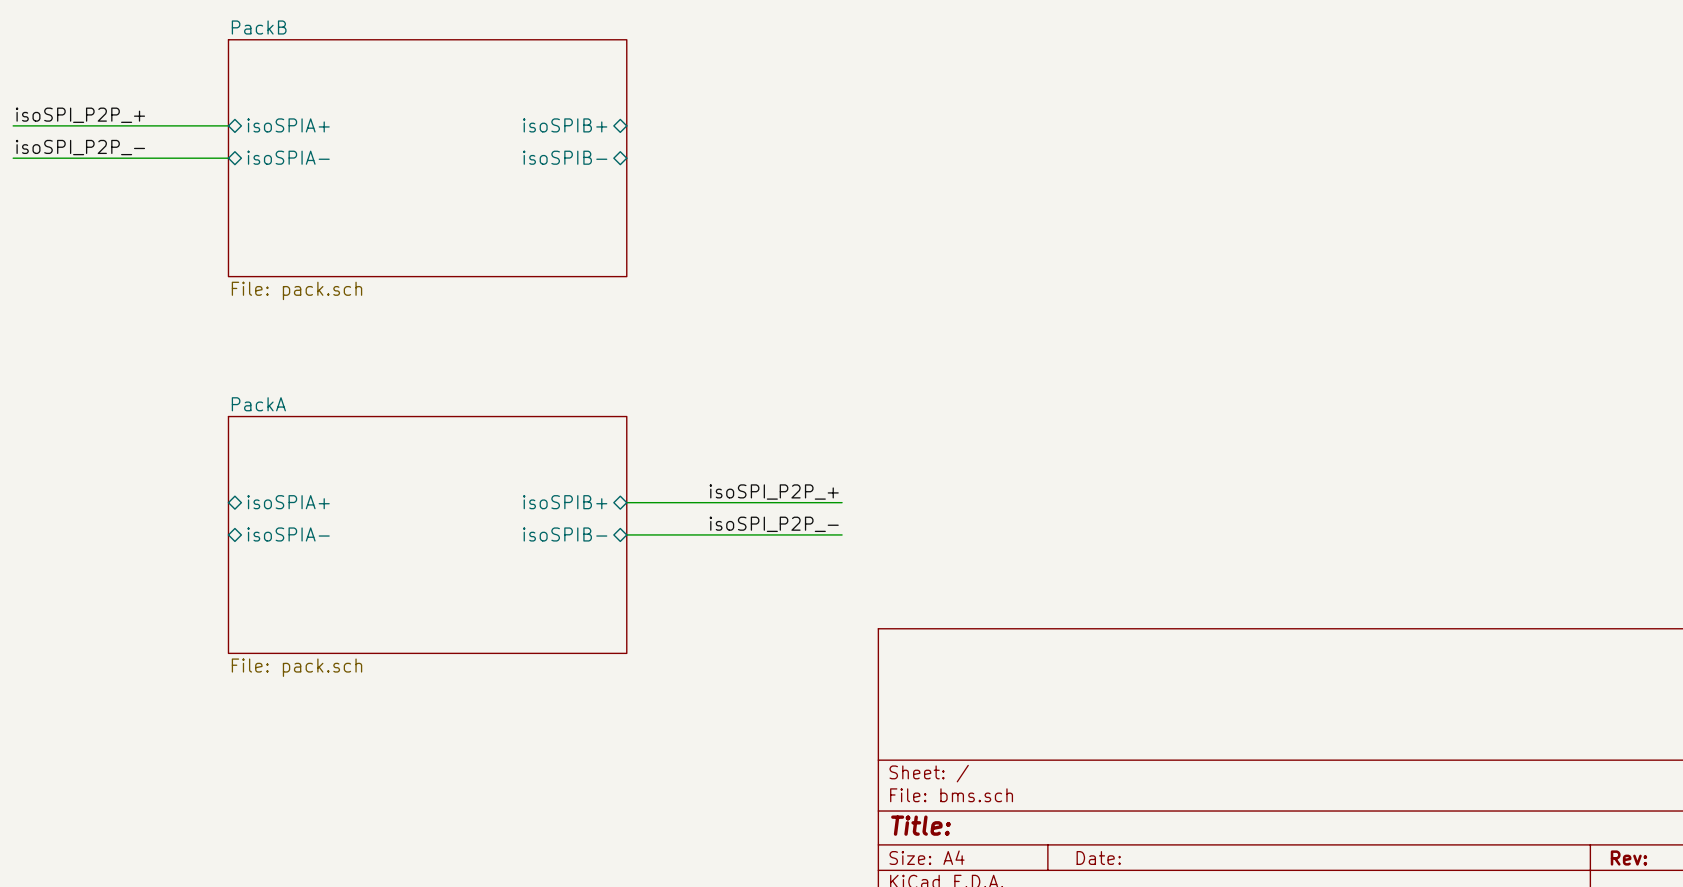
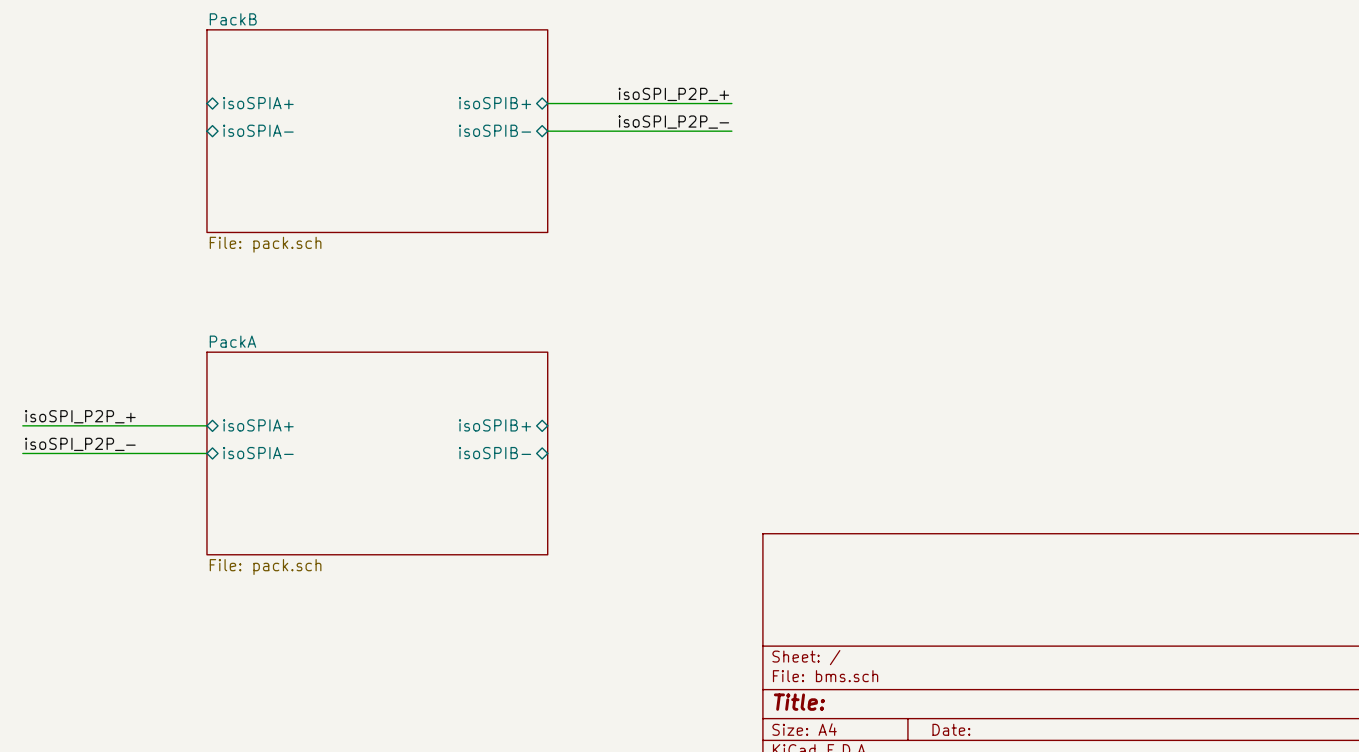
label: isoSPI_P2P_+ (80, 115) -> none
label: none -> isoSPI_P2P_+ (673, 94)
wire: (13, 125) (228, 125) -> none
wire: none -> (547, 103) (731, 103)
label: isoSPI_P2P_- (80, 147) -> none
label: none -> isoSPI_P2P_- (673, 122)
wire: (13, 158) (228, 158) -> none
wire: none -> (547, 131) (731, 131)
label: none -> isoSPI_P2P_+ (80, 416)
label: isoSPI_P2P_+ (774, 492) -> none
wire: none -> (22, 425) (206, 425)
wire: (626, 502) (842, 502) -> none
label: none -> isoSPI_P2P_- (80, 444)
label: isoSPI_P2P_- (774, 524) -> none
wire: none -> (22, 453) (206, 453)
wire: (626, 534) (842, 534) -> none

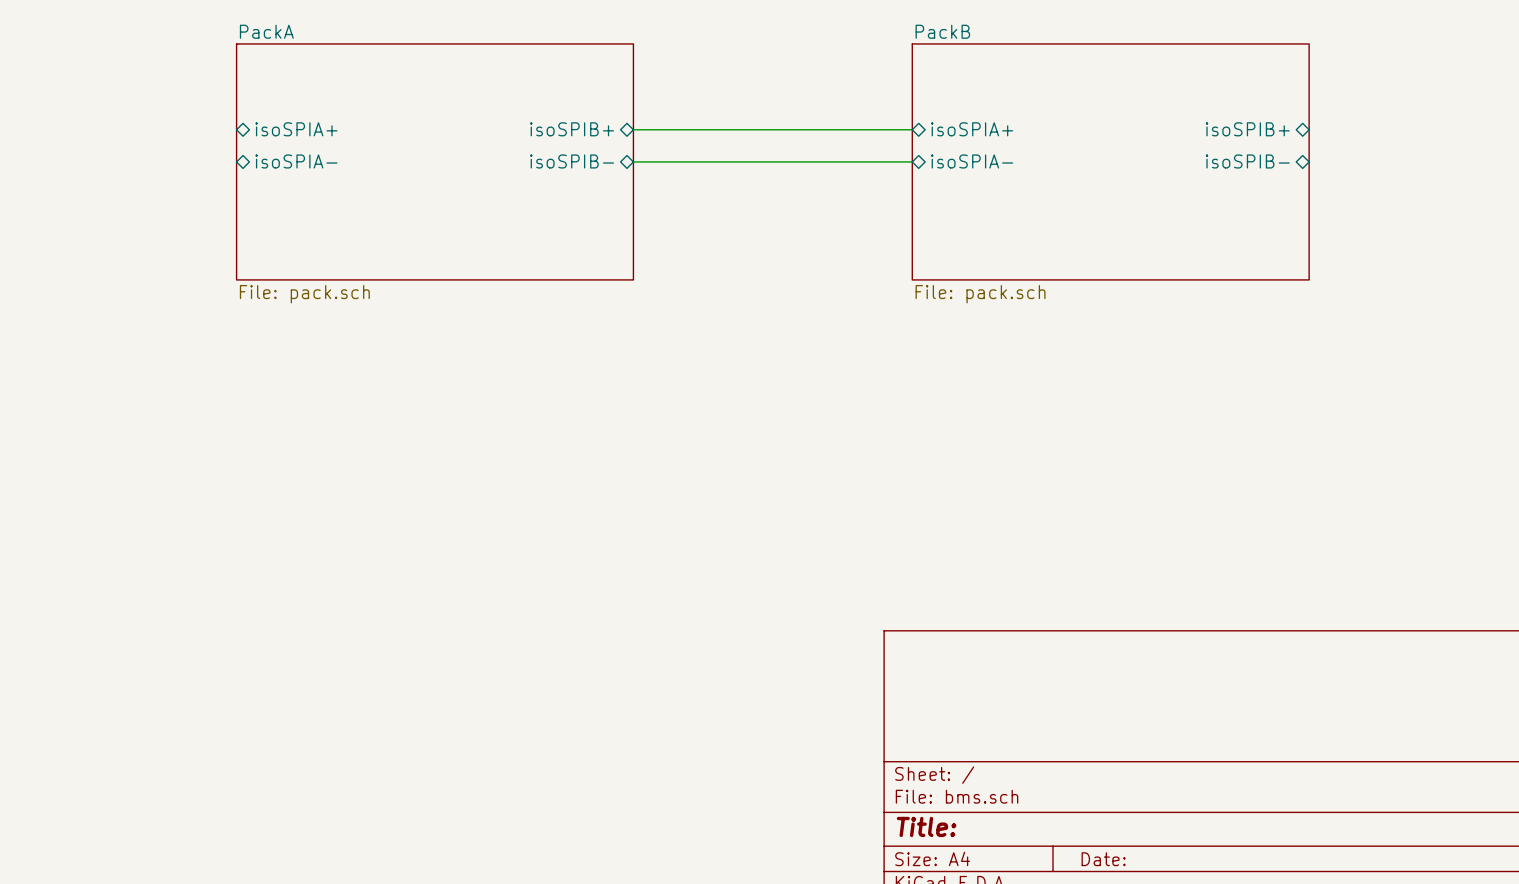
sheet PackB name: PackB (233, 19) -> PackA (266, 31)
label: isoSPI_P2P_+ (673, 94) -> none
wire: none -> (847, 129) (912, 129)
sheet pin: none -> isoSPIA+ (972, 129)
sheet pin: none -> isoSPIB+ (1247, 129)
label: isoSPI_P2P_- (673, 122) -> none
sheet pin: none -> isoSPIA- (972, 161)
sheet pin: none -> isoSPIB- (1247, 161)
wire: none -> (847, 161) (912, 161)
sheet PackB: none -> File: pack.sch (1110, 161)
label: isoSPI_P2P_+ (80, 416) -> none
wire: (22, 425) (206, 425) -> none
sheet pin: isoSPIA+ (258, 425) -> none
sheet pin: isoSPIB+ (495, 425) -> none
label: isoSPI_P2P_- (80, 444) -> none
wire: (22, 453) (206, 453) -> none
sheet pin: isoSPIA- (258, 453) -> none
sheet PackA: File: pack.sch (377, 453) -> none
sheet pin: isoSPIB- (495, 453) -> none

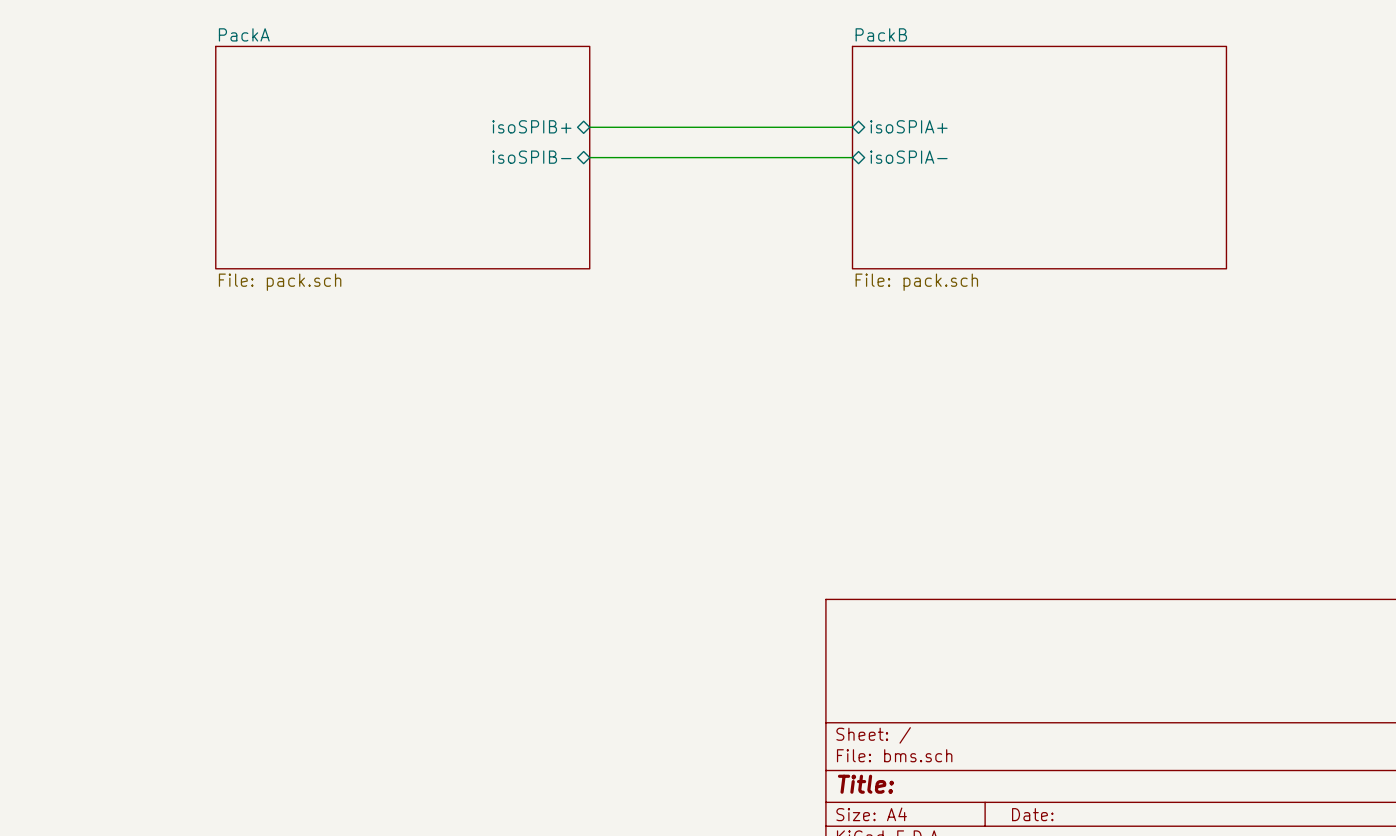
sheet pin: isoSPIA+ (296, 129) -> none
sheet pin: isoSPIB+ (1247, 129) -> none
sheet pin: isoSPIA- (296, 161) -> none
sheet pin: isoSPIB- (1247, 161) -> none

